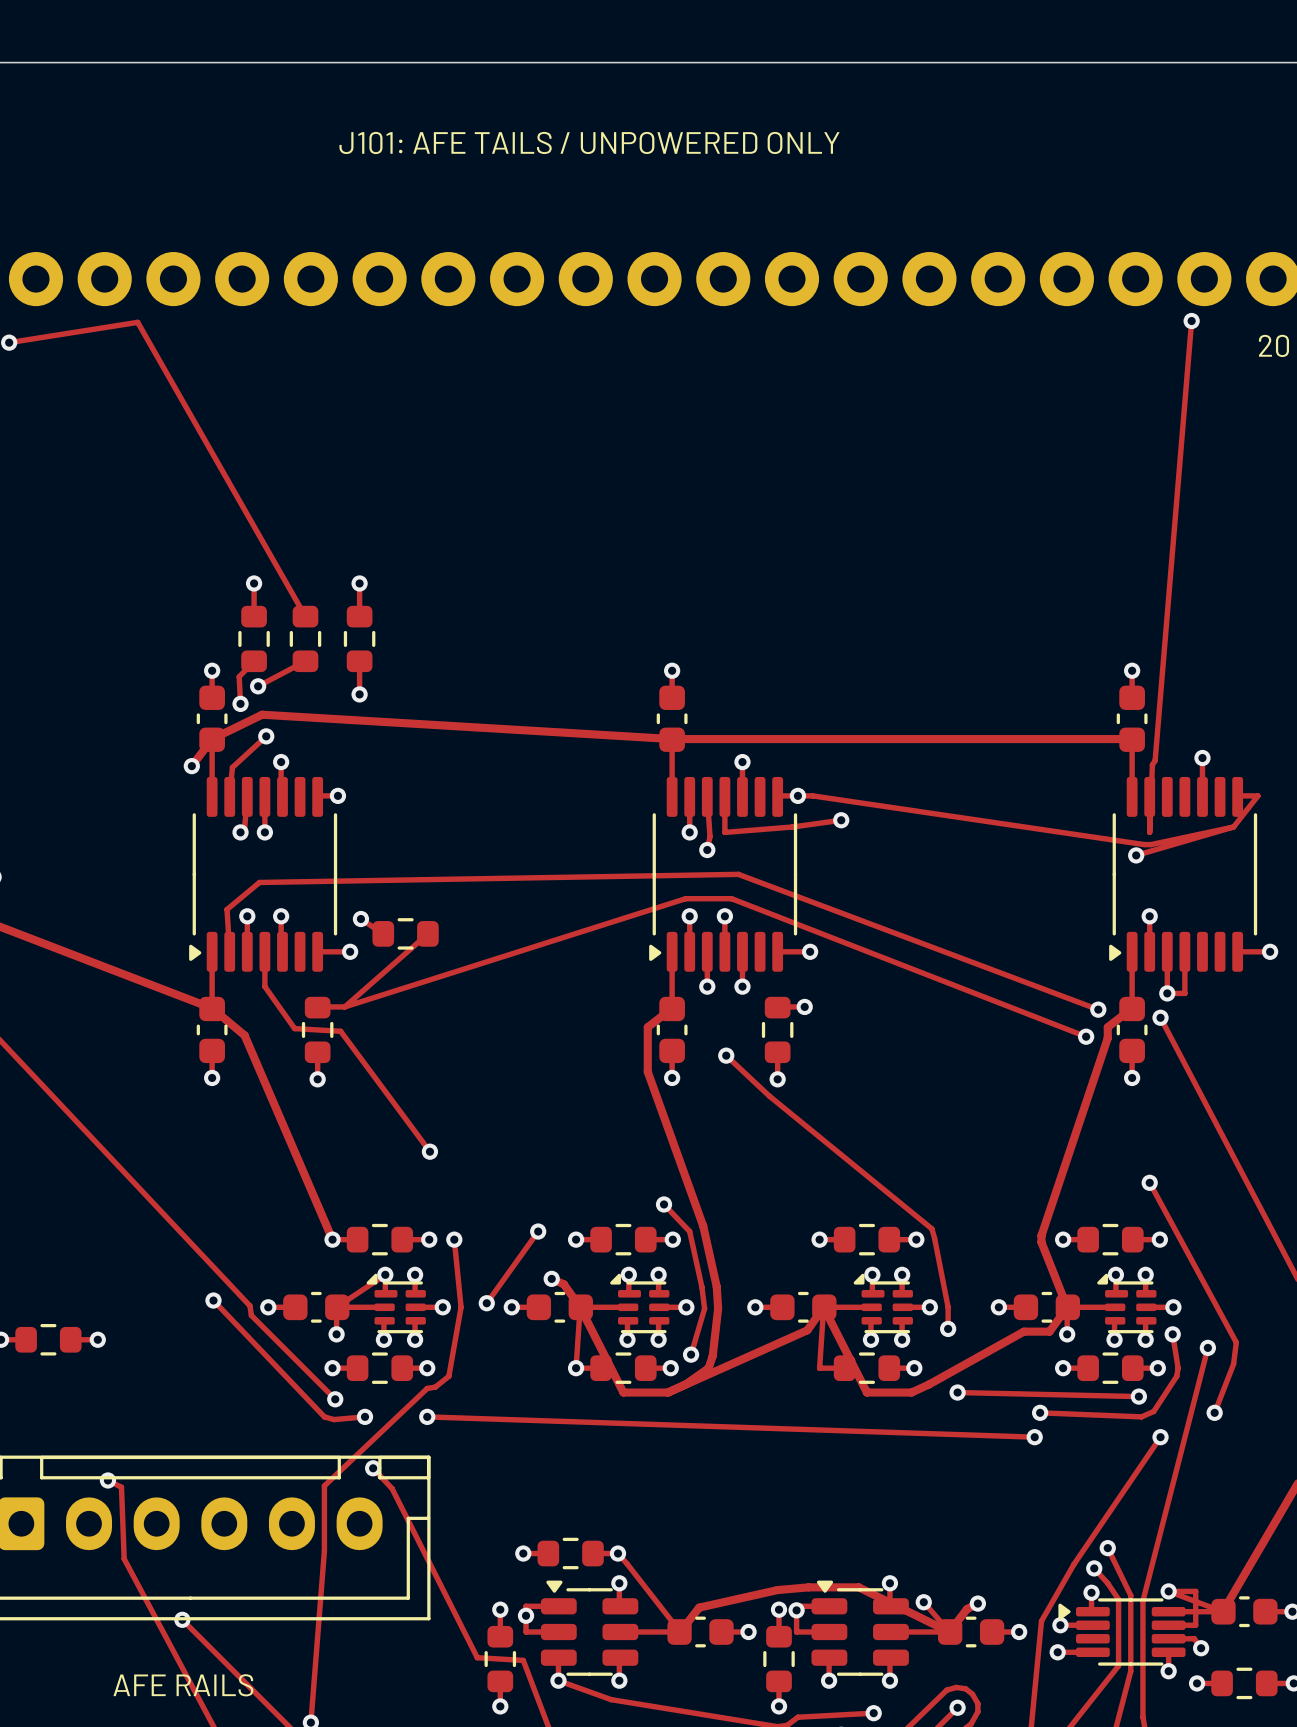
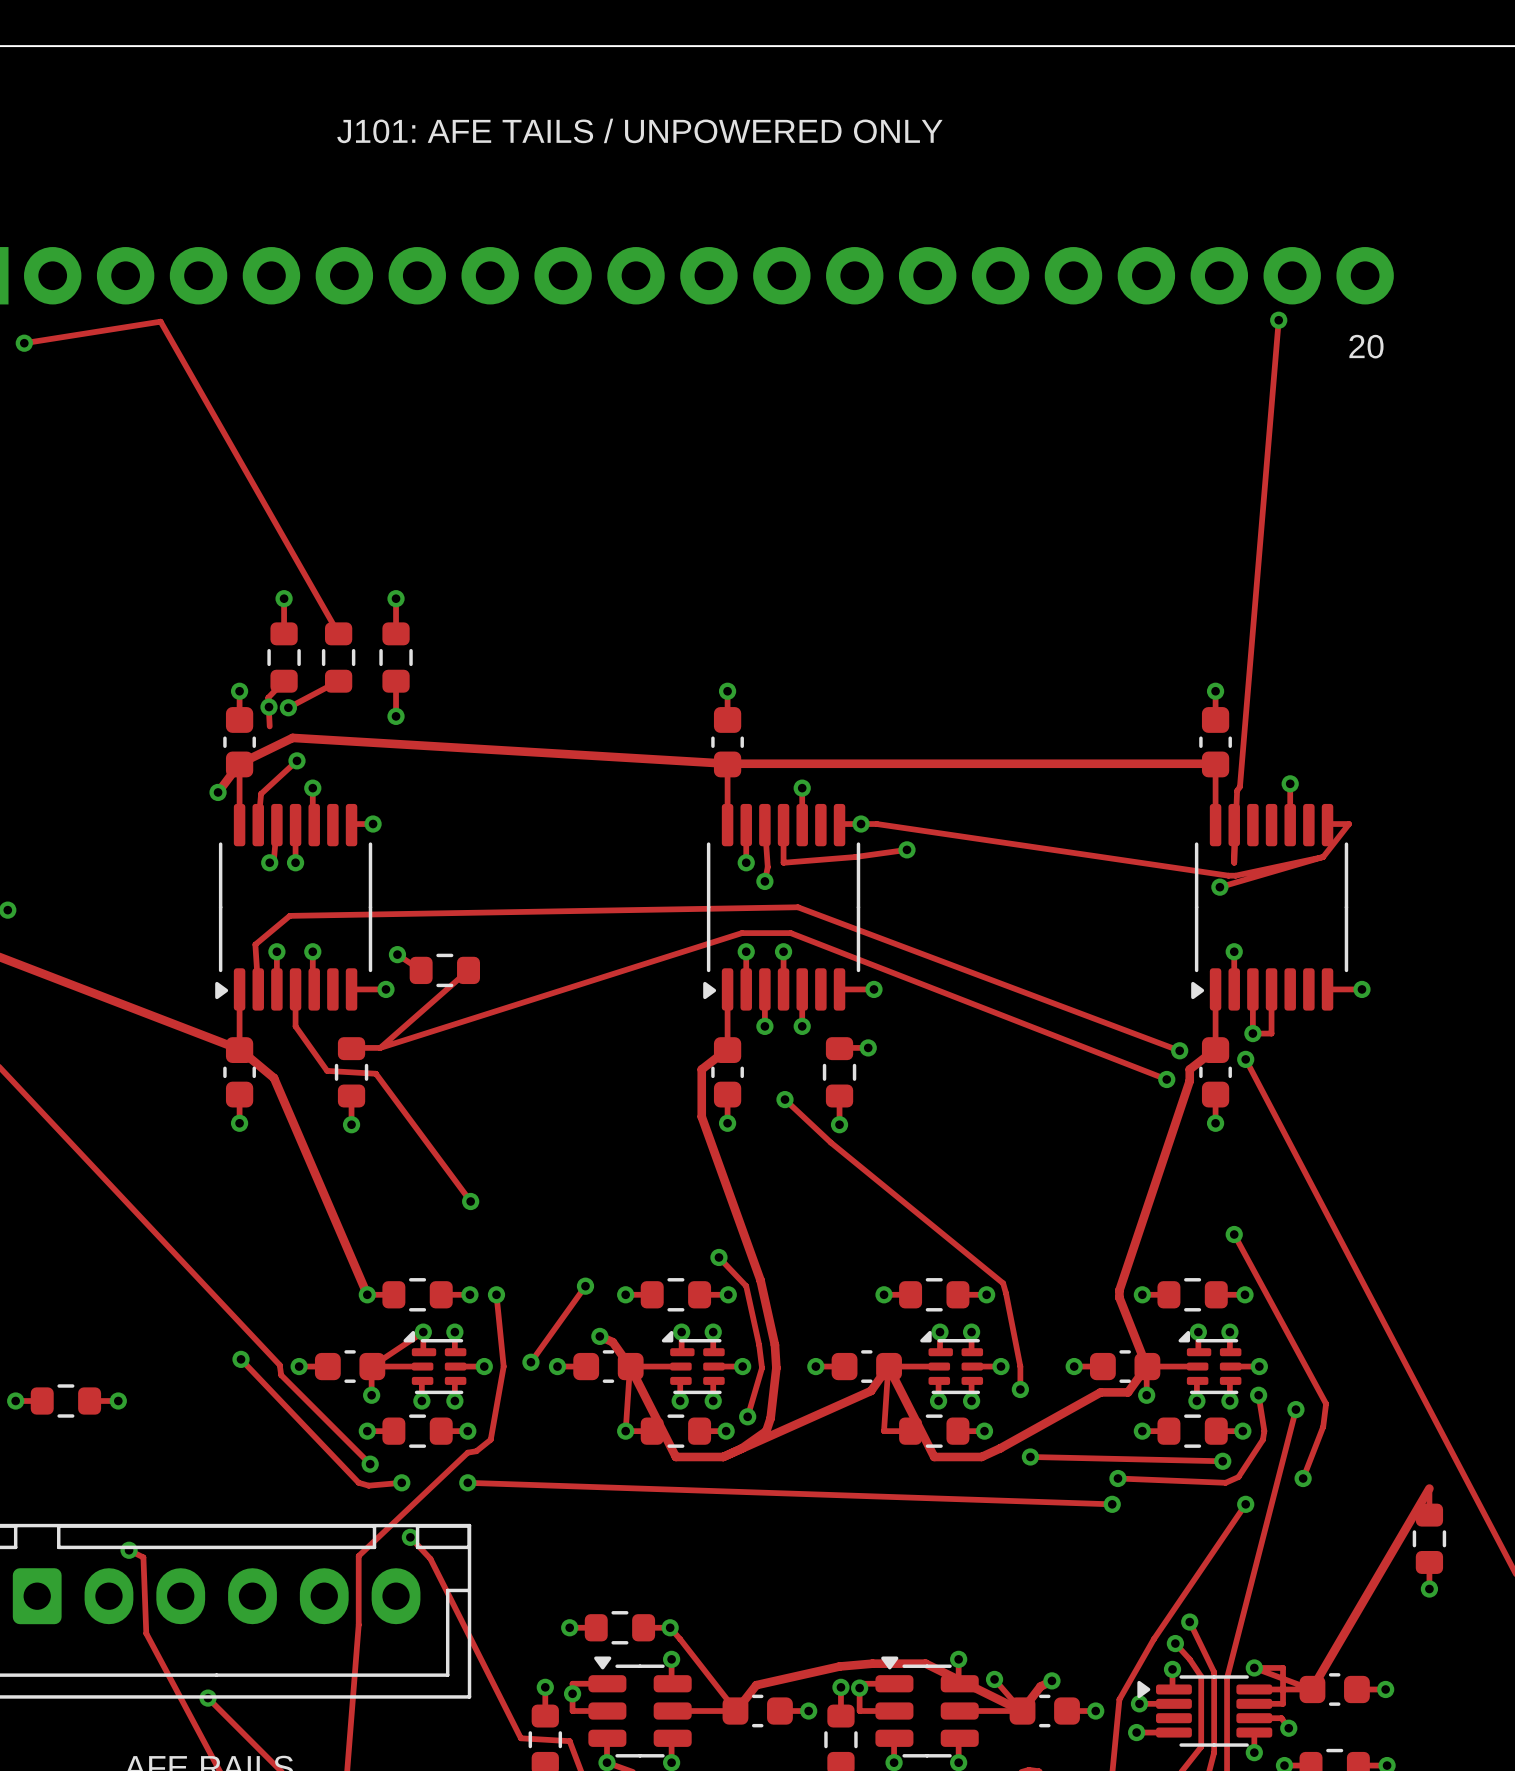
via position: (240, 703) -> (269, 707)

